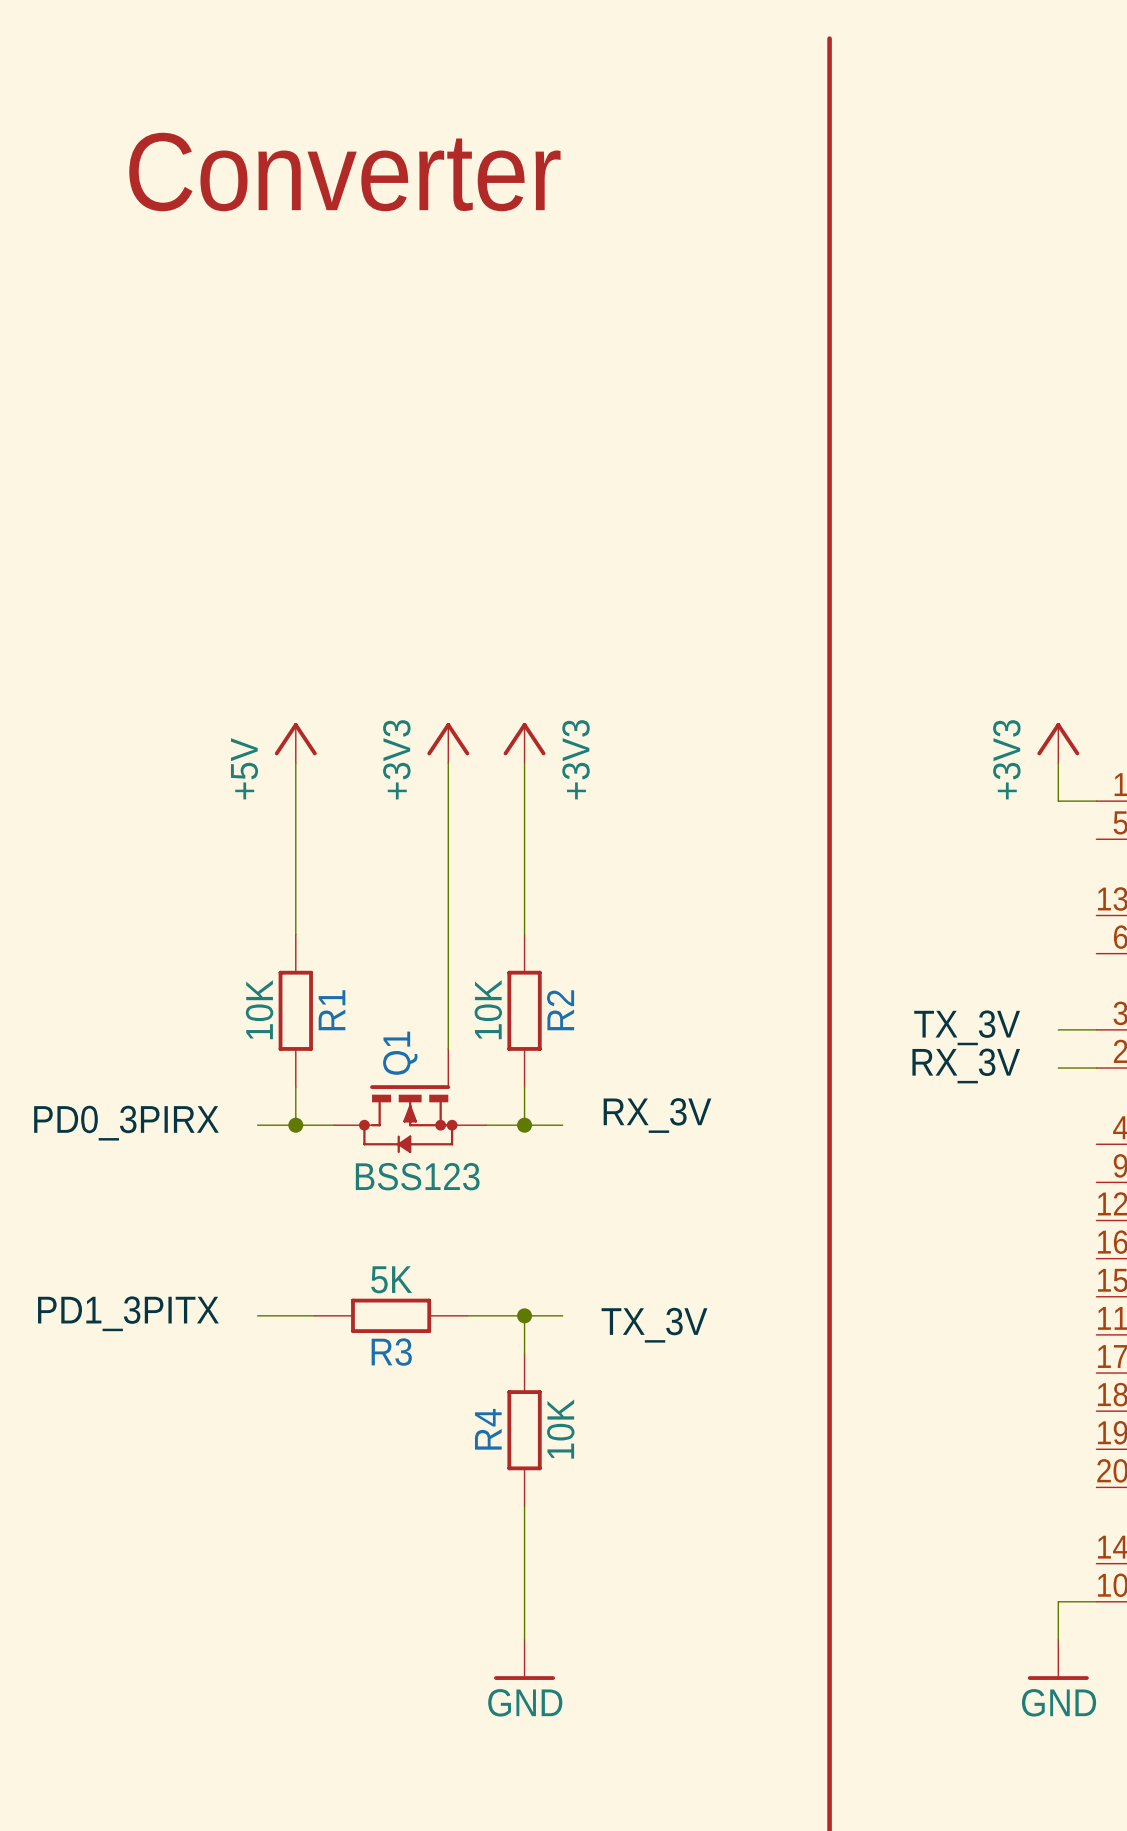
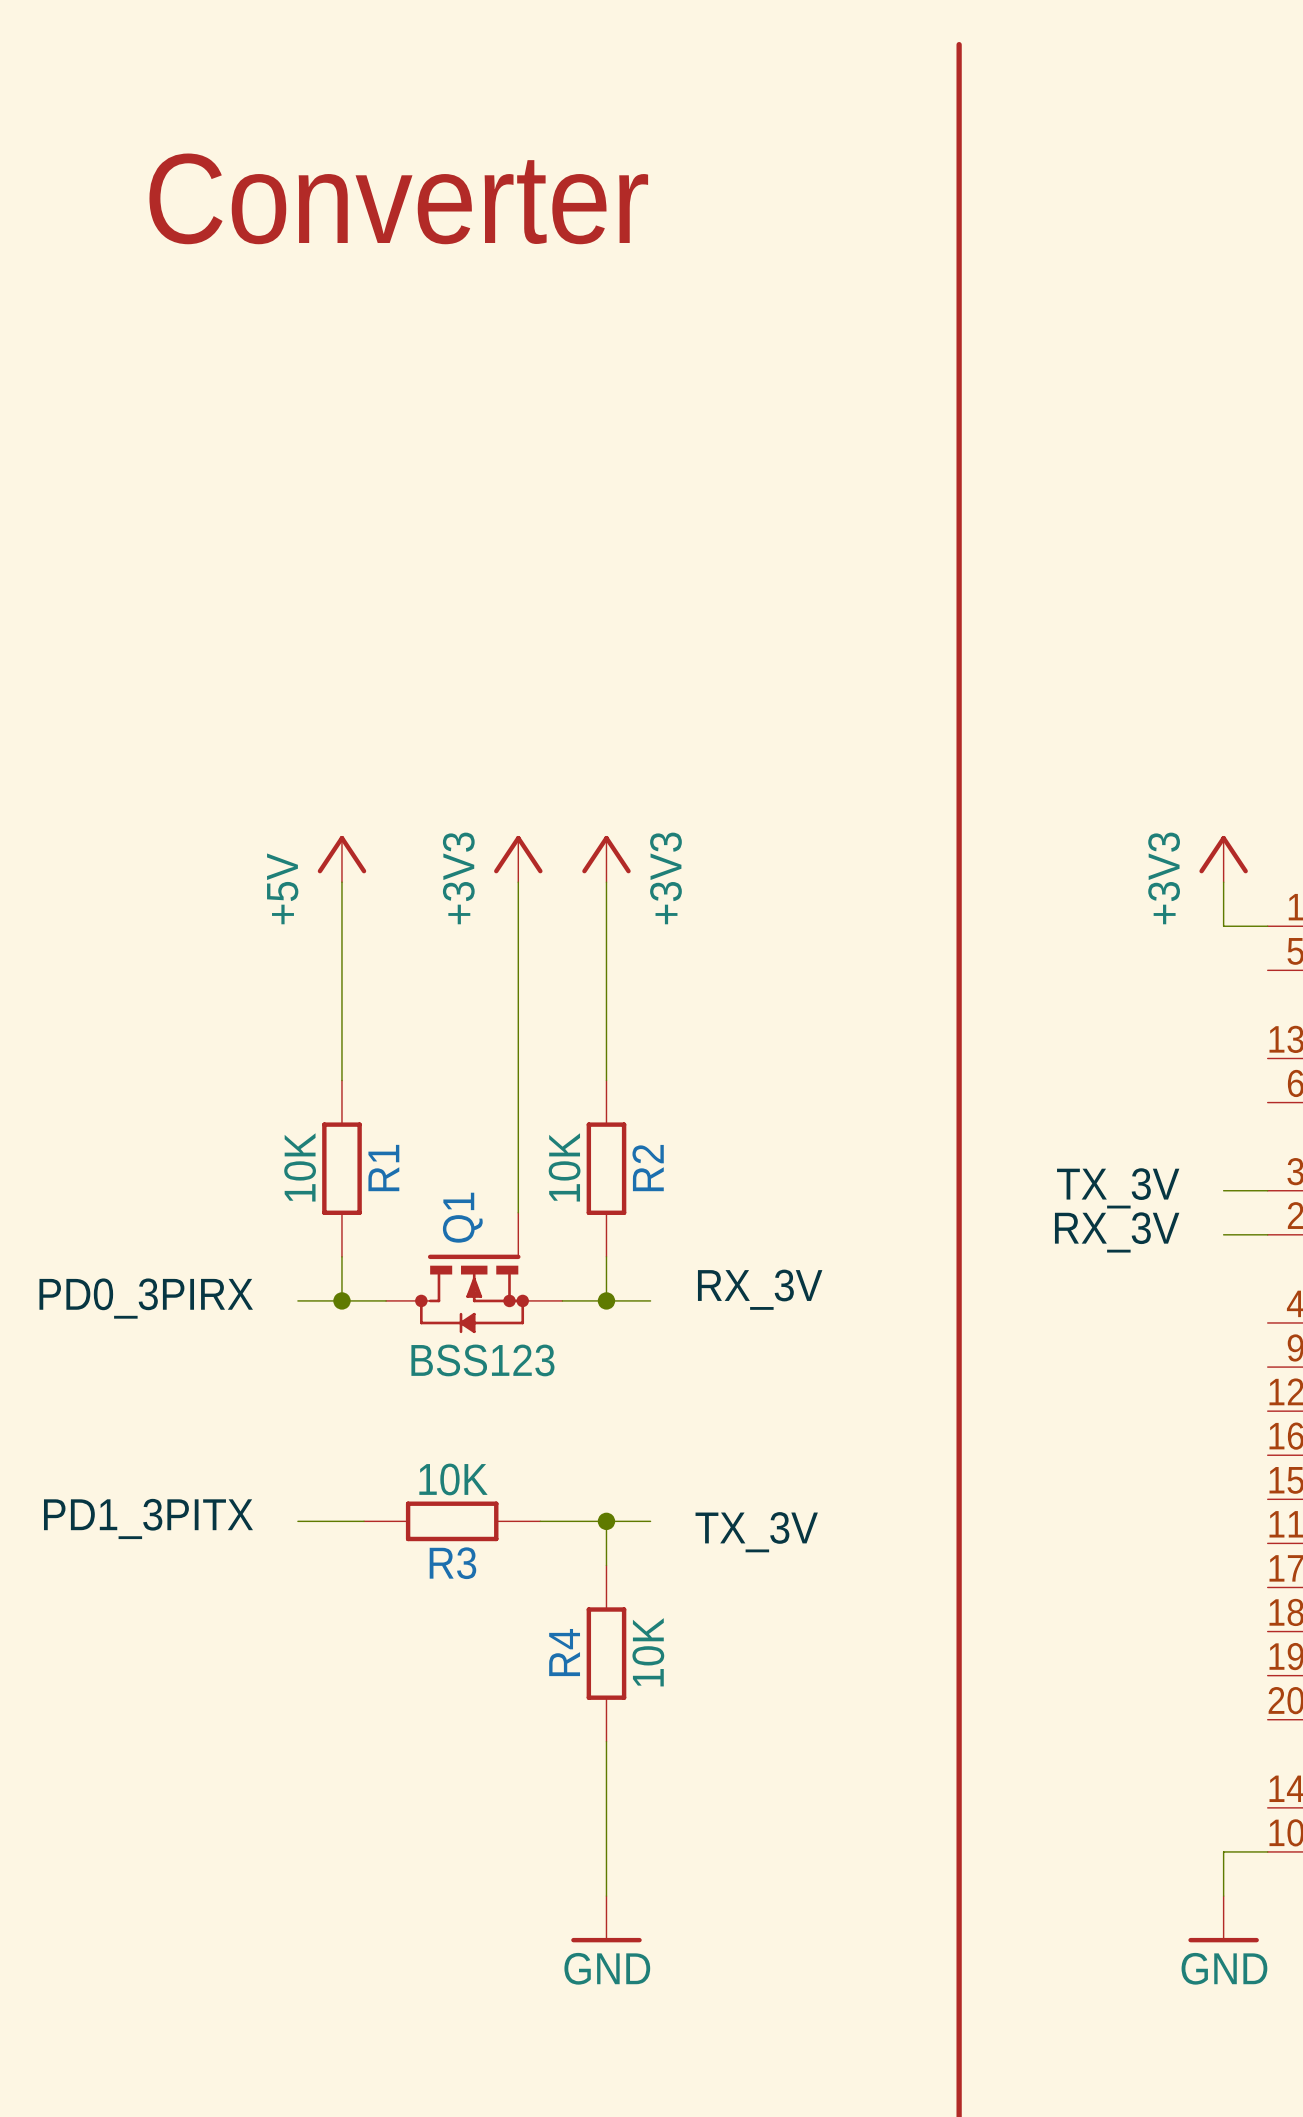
R3 value: 5K (391, 1279) -> 10K (453, 1479)

